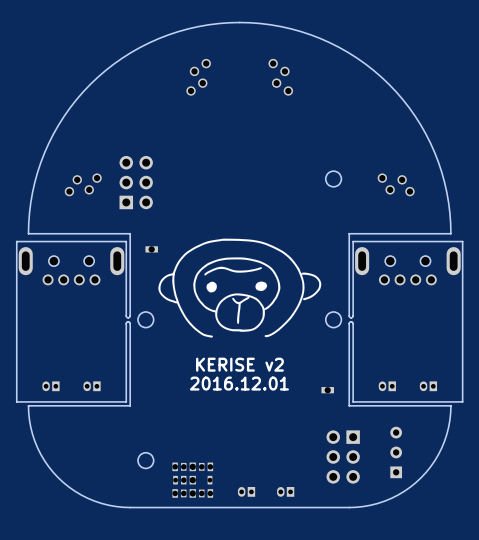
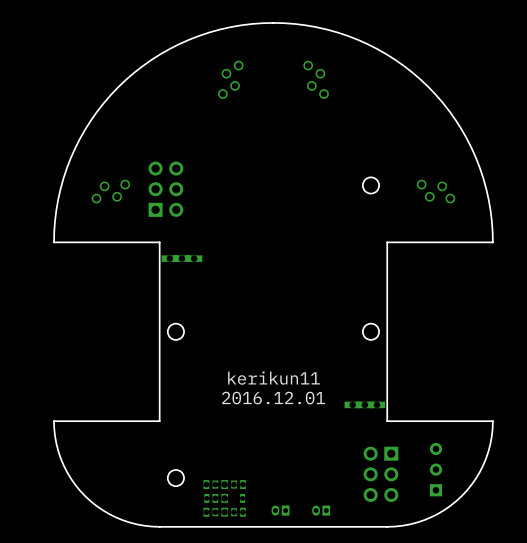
drawing: [158, 238, 322, 338] -> none
part footprint: [145, 246, 158, 253] -> [161, 255, 203, 262]
part: (71, 266) -> none
part: (407, 266) -> none
board edge: (130, 315) (128, 317) (126, 315) (126, 241) (16, 241) (16, 401) (126, 401) (126, 323) (128, 321) (130, 323) -> (159, 327) (159, 335)
board edge: (349, 315) (351, 317) (353, 315) (353, 241) (462, 241) (462, 401) (353, 401) (353, 323) (351, 321) (349, 323) -> (387, 327) (387, 335)
text: KERISE v2 (239, 364) -> kerikun11 (273, 378)
part: (50, 386) -> none
part: (92, 386) -> none
part: (387, 386) -> none
part: (428, 386) -> none
part footprint: [321, 387, 334, 394] -> [344, 401, 386, 409]

